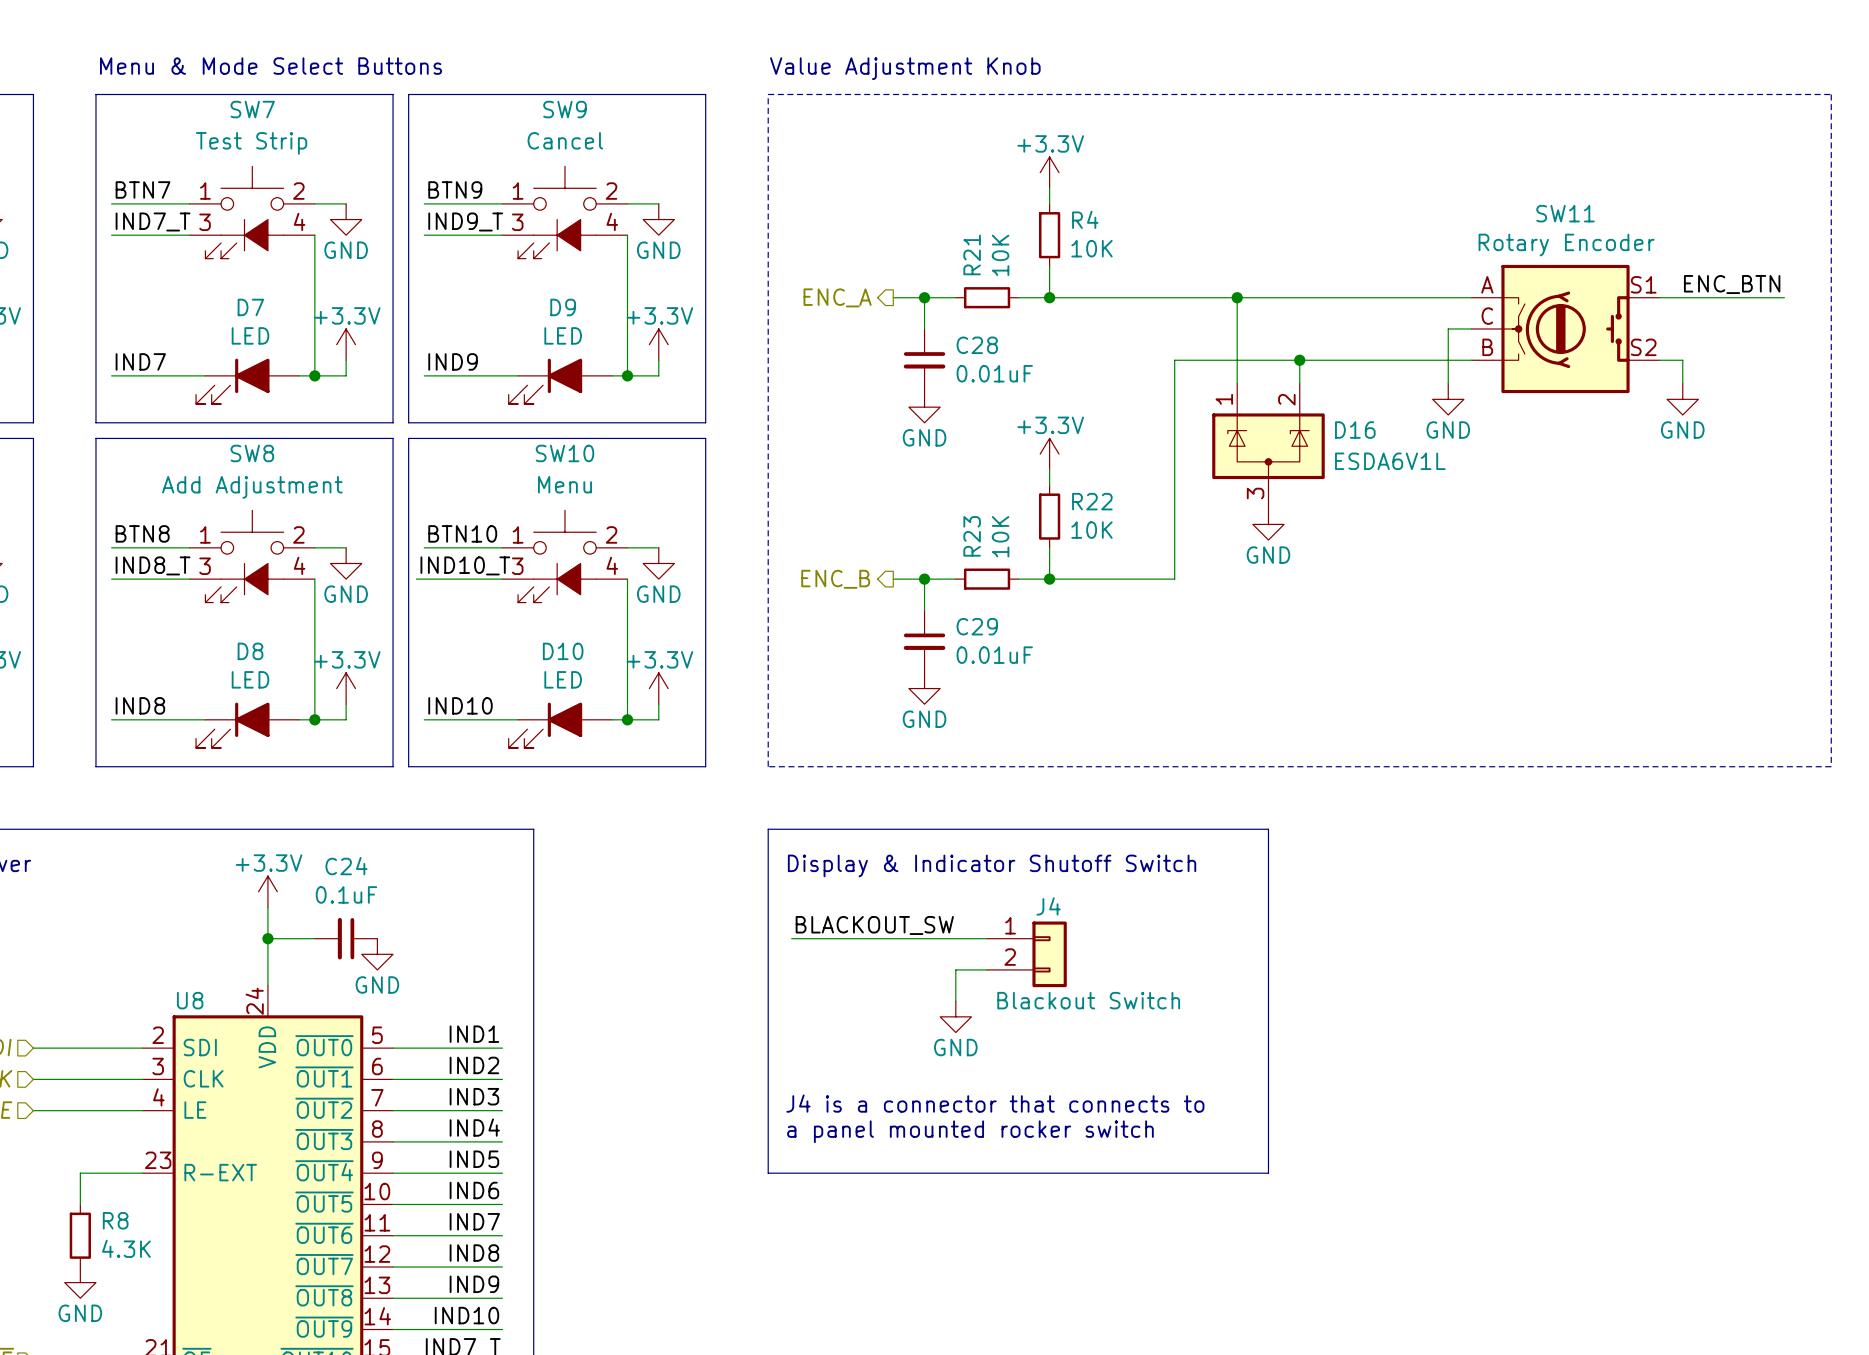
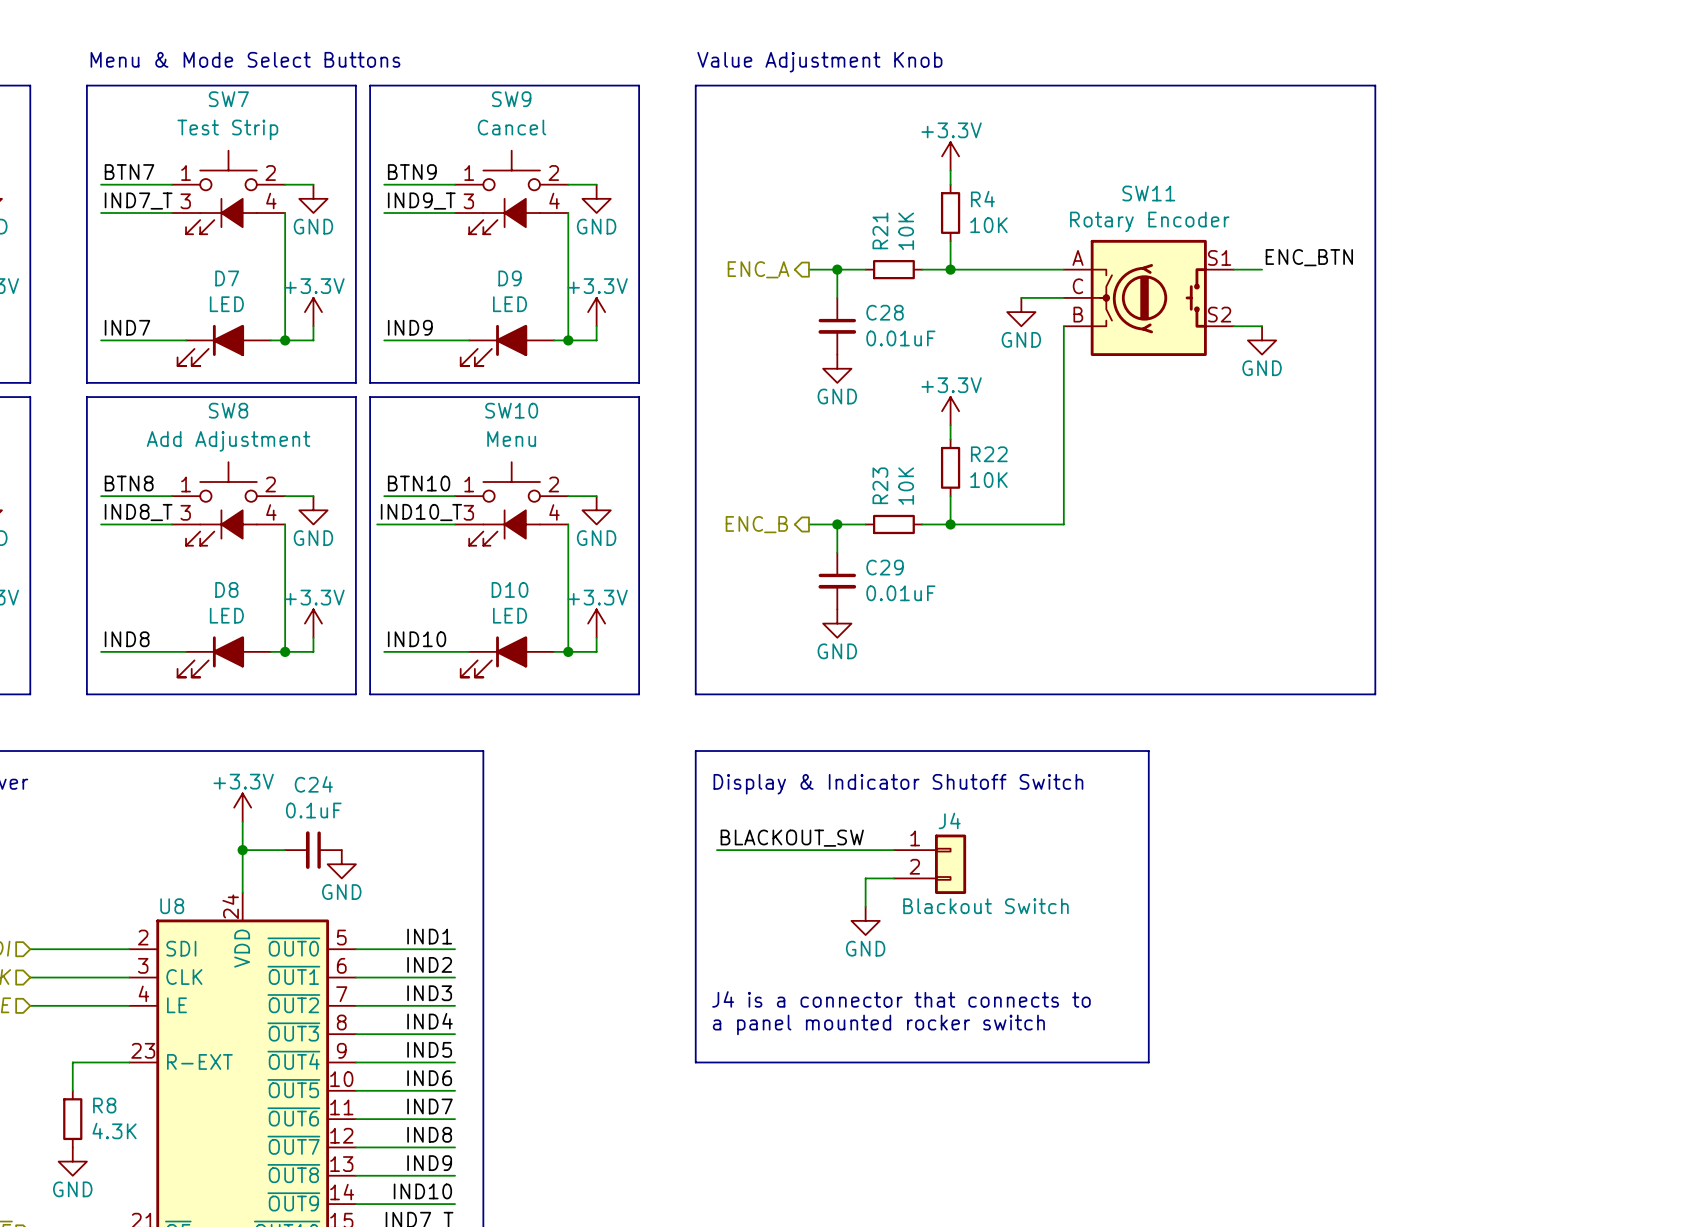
line: (768, 94) (1831, 94) (1831, 766) (768, 766) (768, 94) -> (695, 85) (695, 694) (1375, 694) (1375, 85) (695, 85)
label: none -> ENC_BTN (1309, 257)
label: ENC_BTN (1732, 284) -> none
junction: (1237, 297) -> none
wire: (1393, 297) (1471, 297) -> none
wire: (1659, 297) (1784, 297) -> none
wire: none -> (1021, 297) (1063, 297)
wire: (1471, 328) (1448, 328) (1448, 383) -> none
SW11 position: (1565, 328) -> (1148, 297)
power symbol: none -> GND (1021, 312)
junction: (1299, 360) -> none
wire: (1393, 360) (1471, 360) -> none
wire: (1659, 360) (1682, 360) (1682, 383) -> none
power symbol position: GND (1448, 399) -> GND (1262, 340)
power symbol: GND (1682, 399) -> none
D16: ESDA6V1L (1268, 446) -> none
power symbol: GND (1268, 524) -> none

